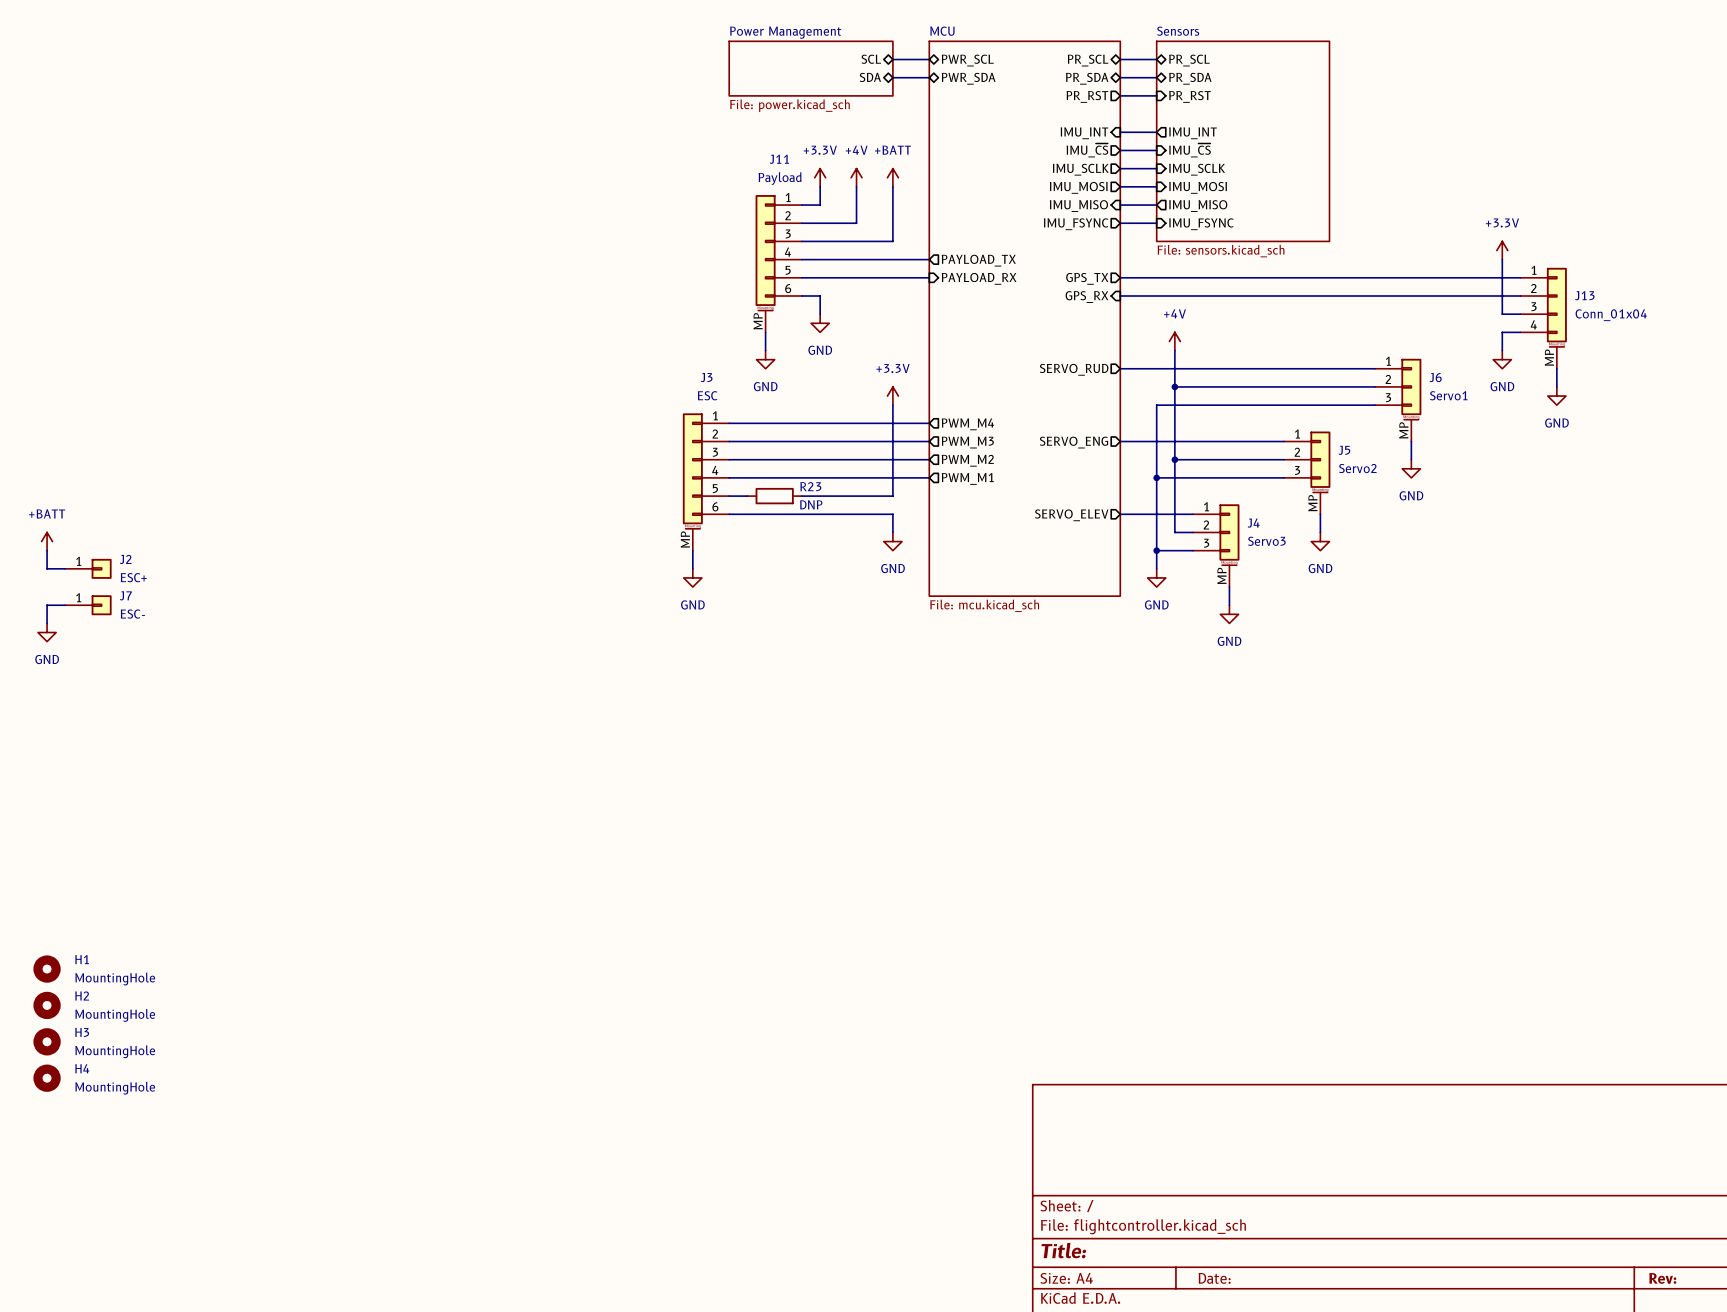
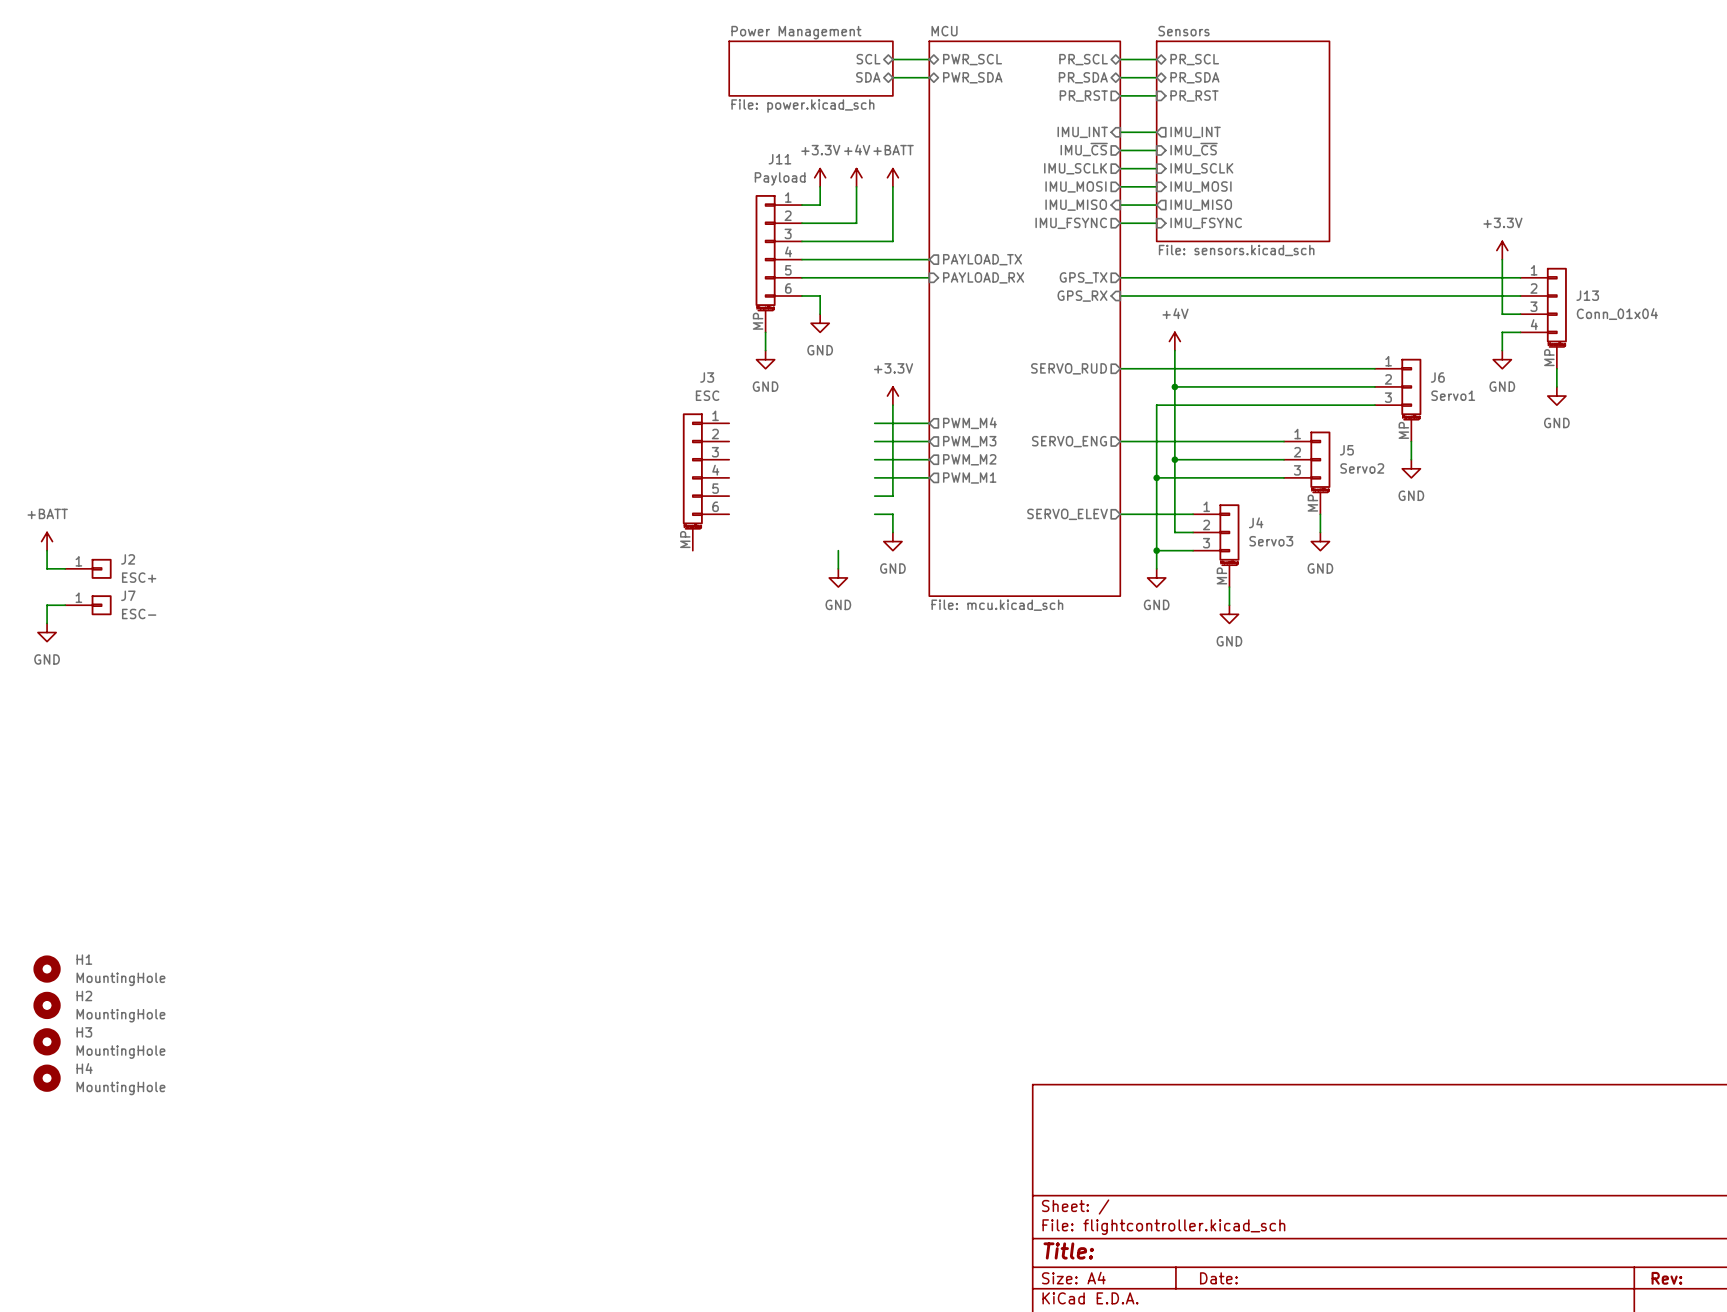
wire: (729, 423) (874, 423) -> none
wire: (729, 441) (874, 441) -> none
wire: (729, 459) (874, 459) -> none
wire: (729, 477) (874, 477) -> none
wire: (729, 496) (747, 496) -> none
R23: DNP (774, 496) -> none
wire: (801, 496) (874, 496) -> none
wire: (729, 514) (874, 514) -> none
wire: (692, 550) (692, 568) -> (838, 550) (838, 568)
power symbol position: GND (692, 577) -> GND (838, 577)

